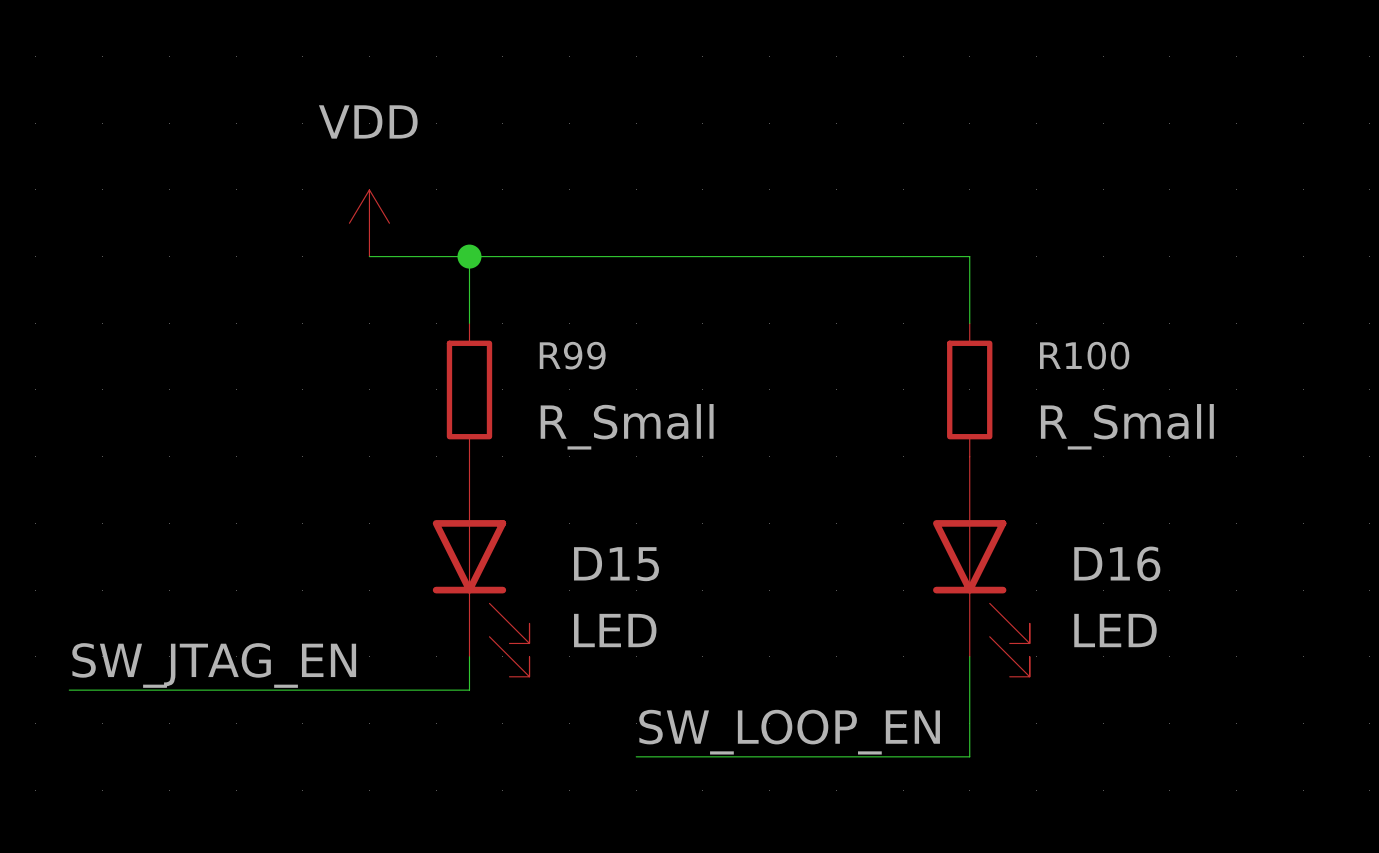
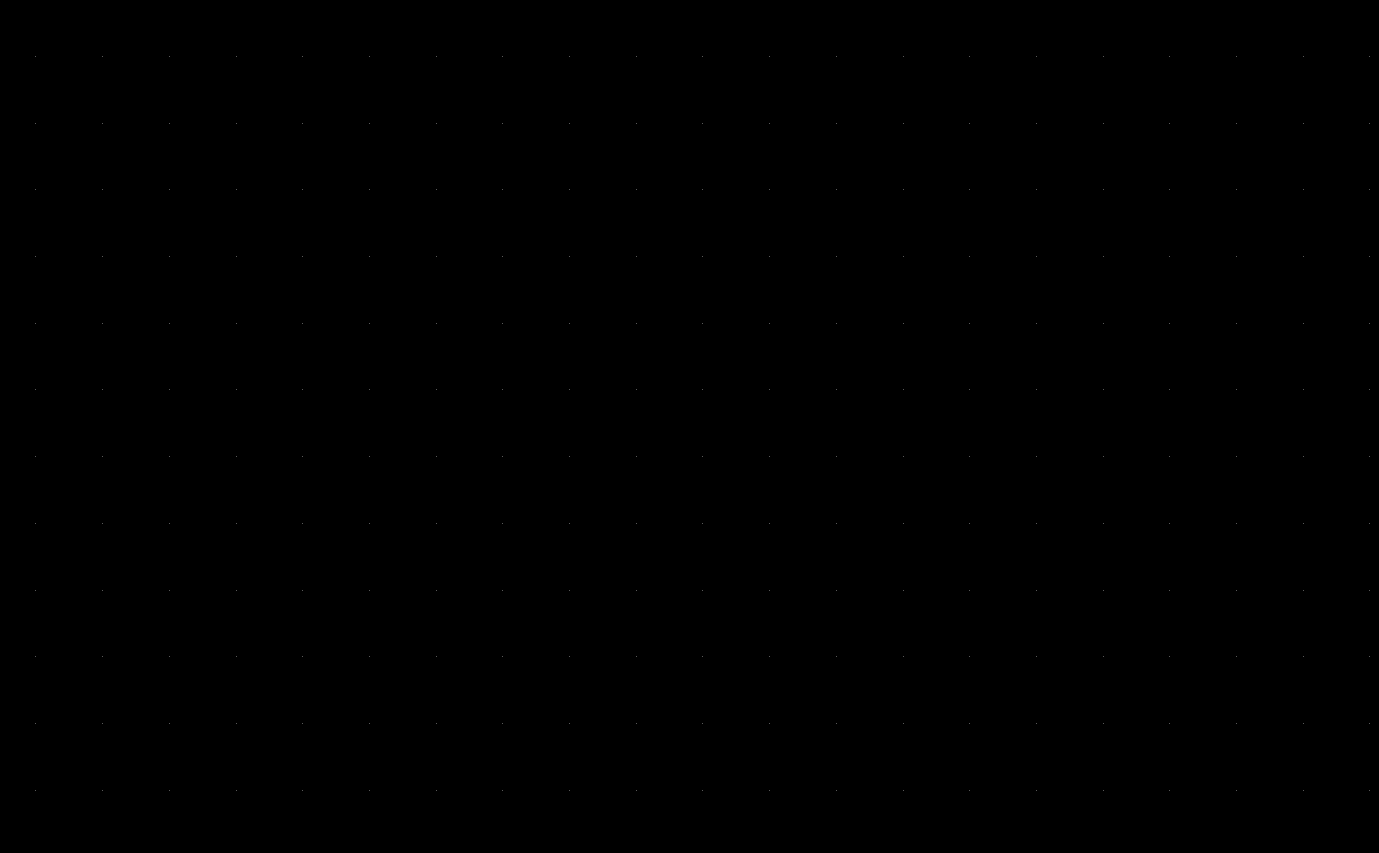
power symbol: VDD (369, 223) -> none
wire: (369, 256) (969, 256) (969, 323) -> none
wire: (469, 256) (469, 323) -> none
junction: (469, 256) -> none
R99: R_Small (469, 389) -> none
R100: R_Small (969, 389) -> none
D15: LED (481, 566) -> none
D16: LED (981, 566) -> none
wire: (469, 656) (469, 690) (69, 690) -> none
wire: (969, 656) (969, 756) (636, 756) -> none
label: SW_JTAG_EN (214, 665) -> none
label: SW_LOOP_EN (789, 732) -> none

